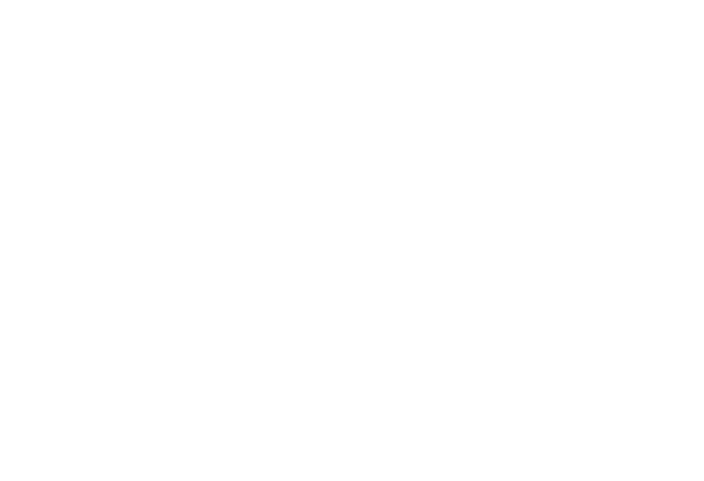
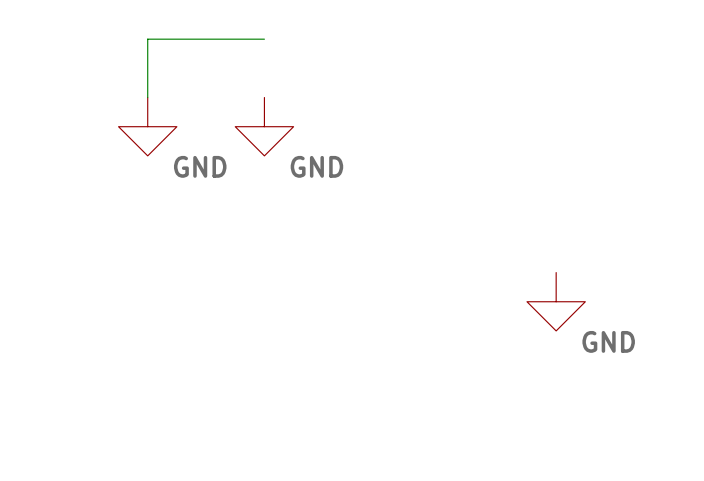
wire: none -> (264, 39) (147, 39) (147, 97)
power symbol: none -> GND (147, 126)
power symbol: none -> GND (264, 126)
power symbol: none -> GND (556, 301)

